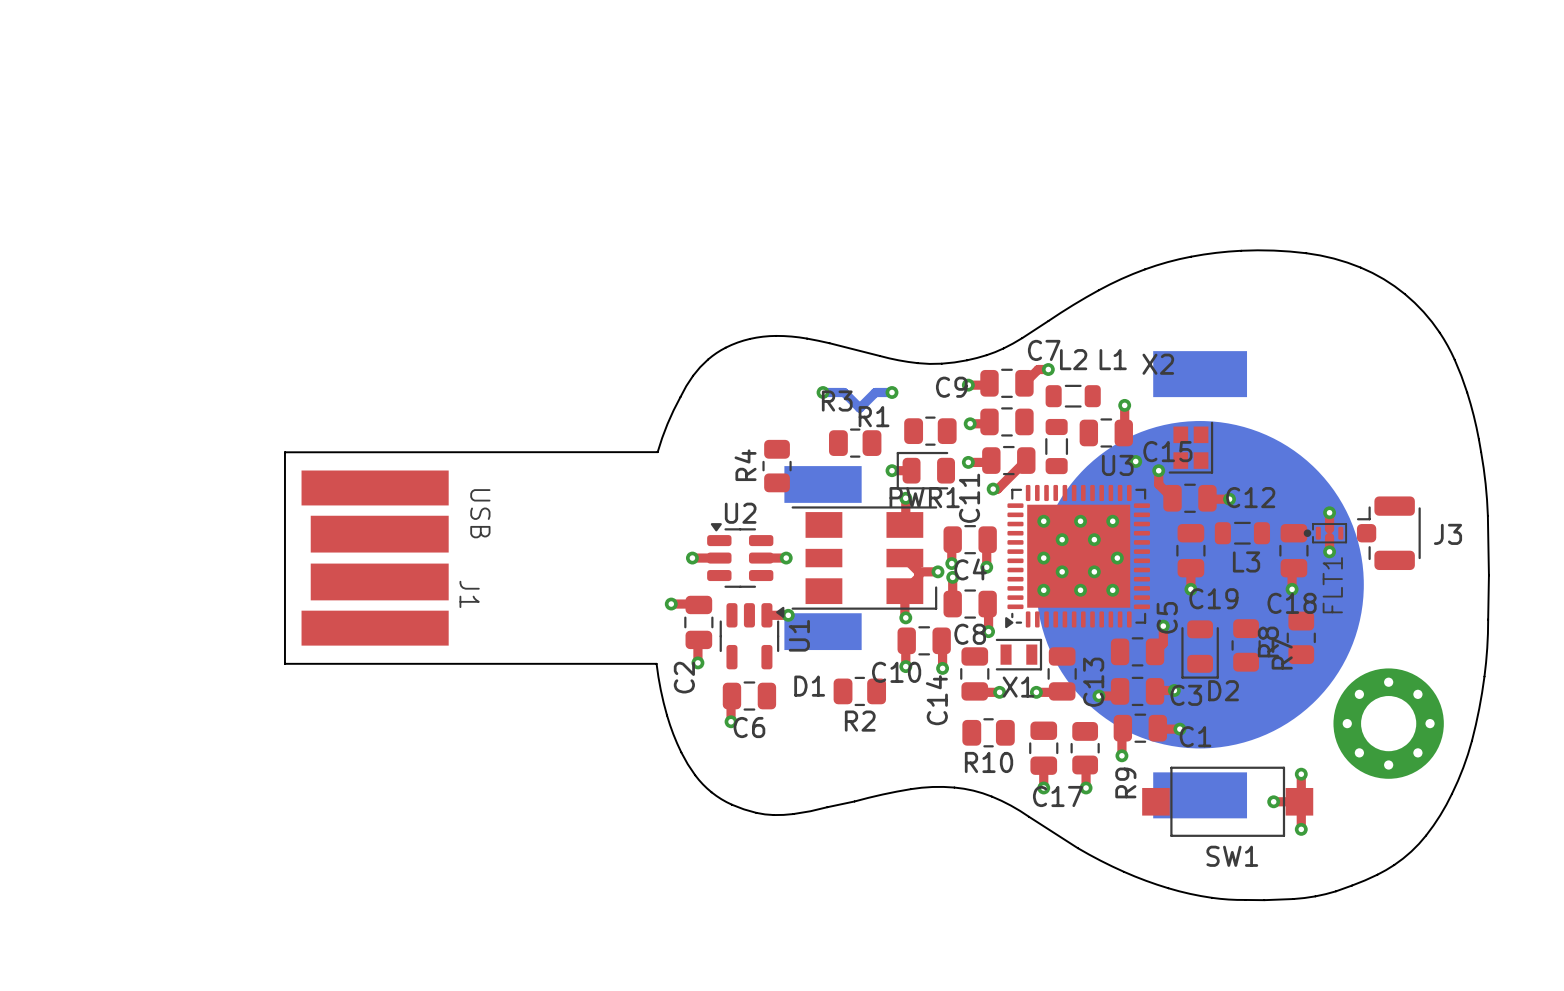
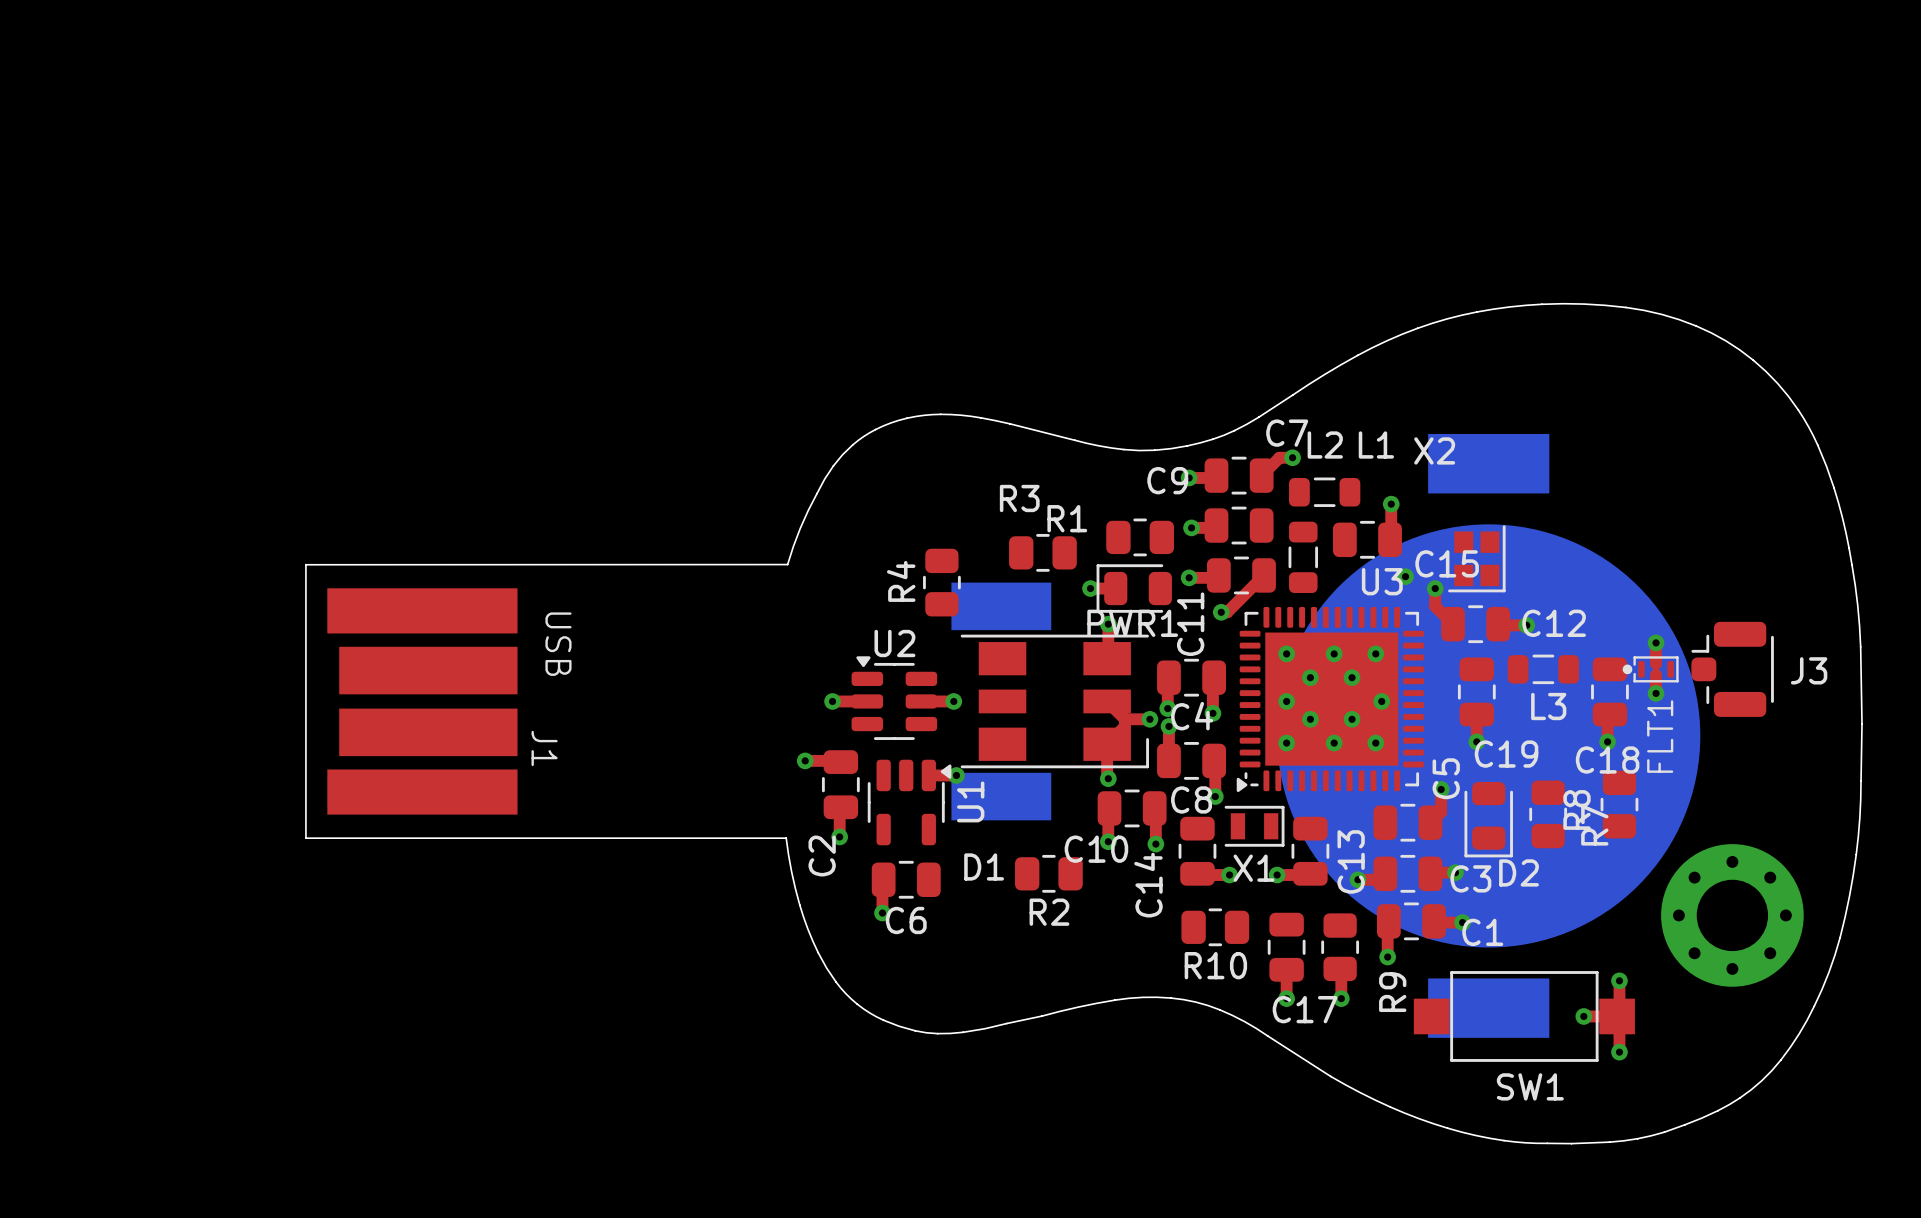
bottom track: (823, 392) (844, 392) (859, 408) (875, 392) (892, 392) -> none
via: (823, 392) -> none
via: (892, 392) -> none

